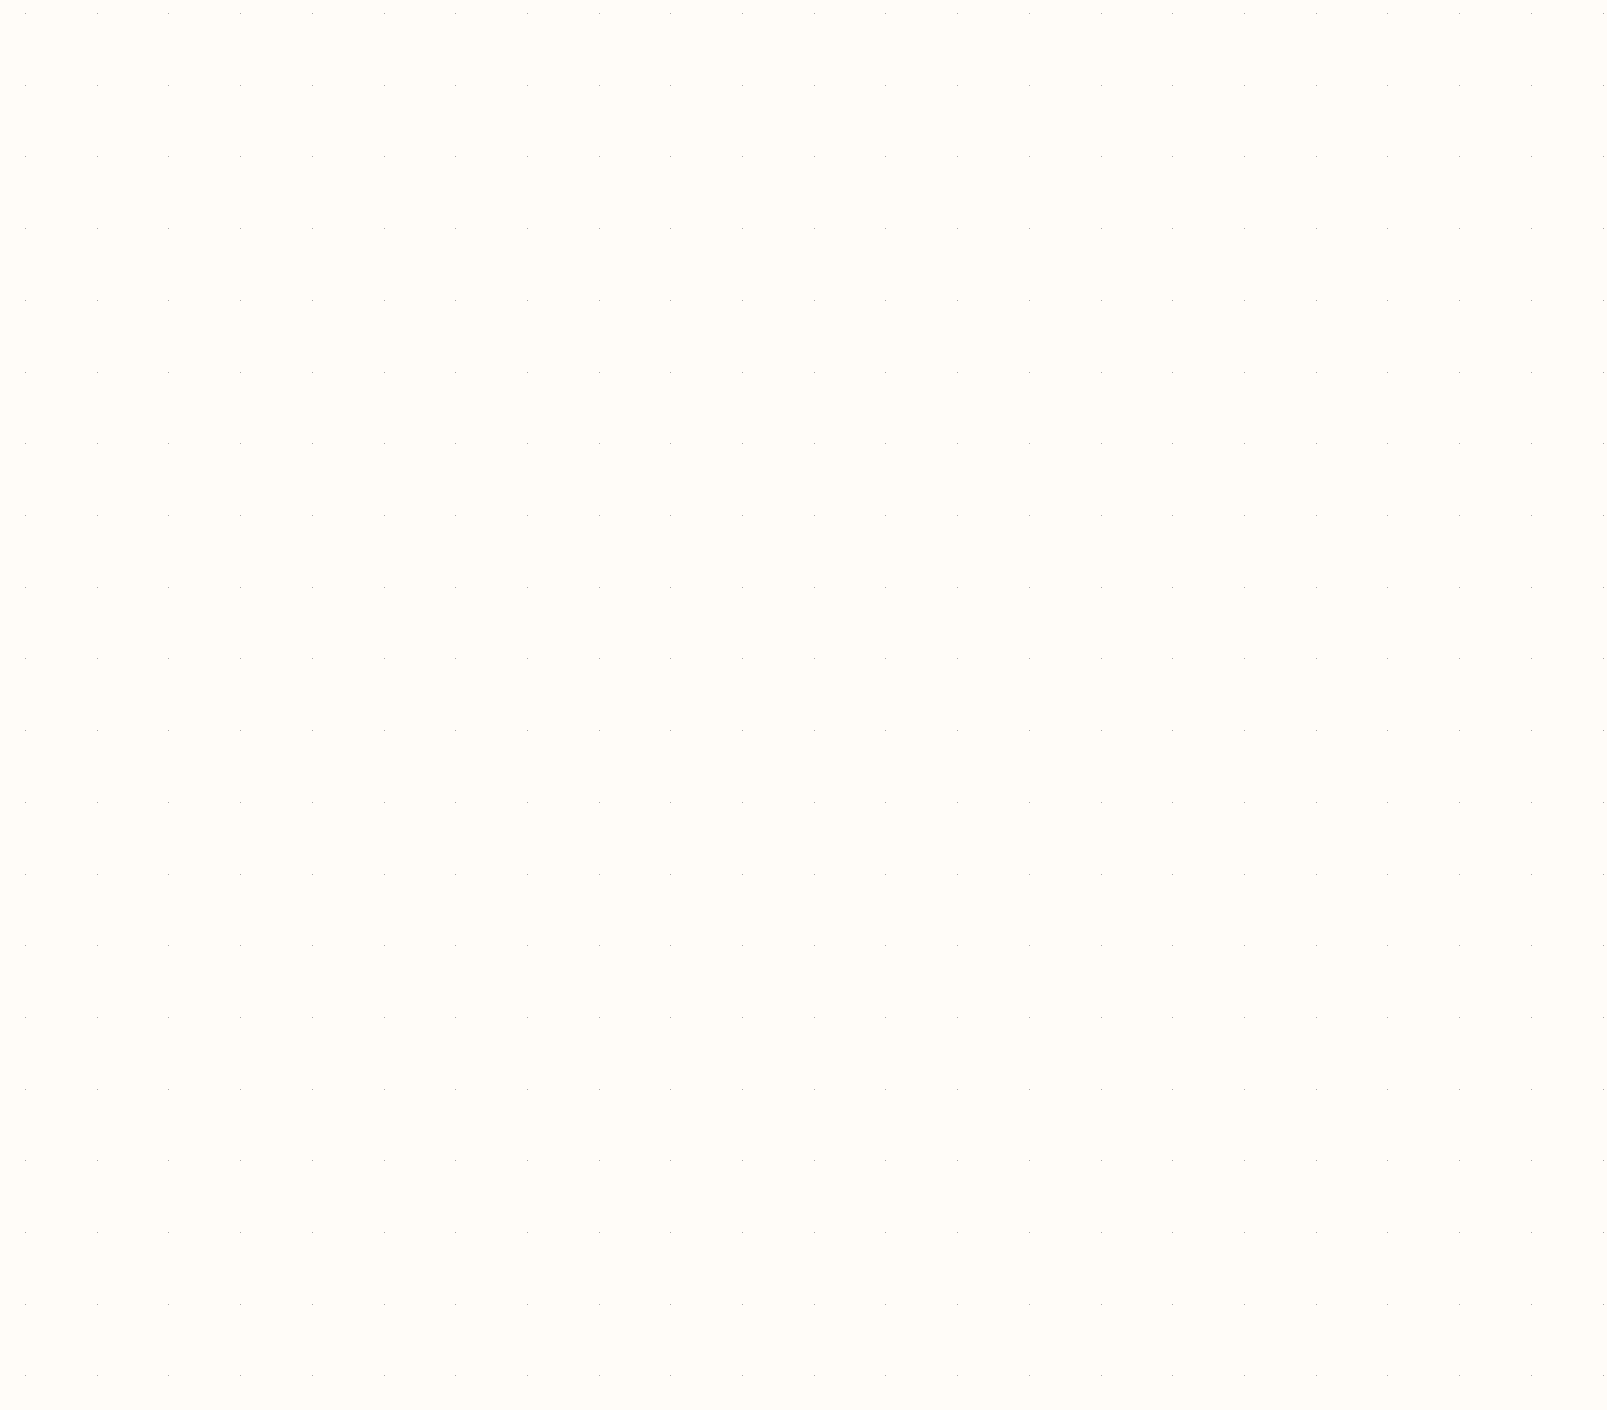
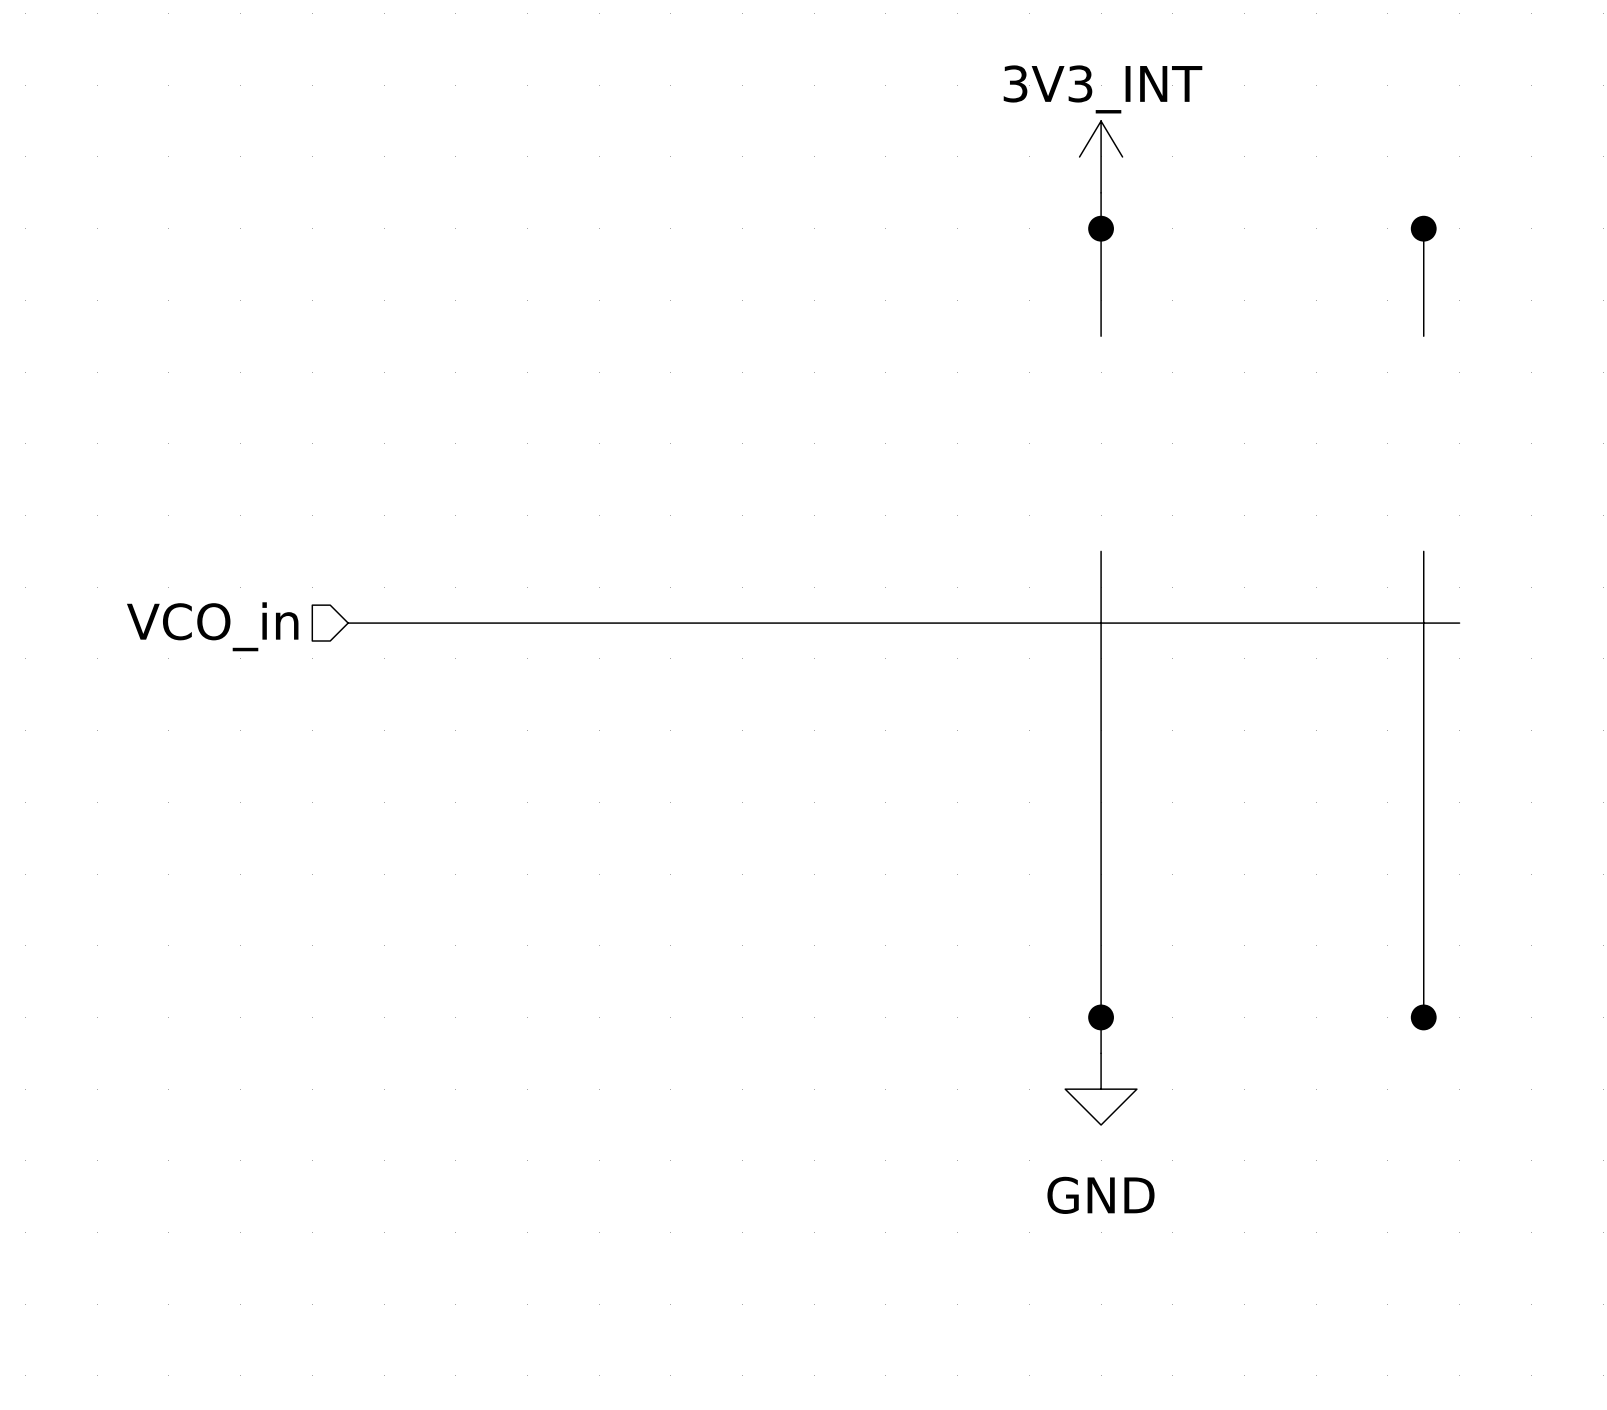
power symbol: none -> 3V3_INT (1101, 156)
wire: none -> (1101, 192) (1101, 336)
junction: none -> (1101, 228)
wire: none -> (1423, 228) (1423, 336)
junction: none -> (1423, 228)
wire: none -> (1101, 551) (1101, 1053)
wire: none -> (1423, 551) (1423, 1017)
wire: none -> (348, 623) (1459, 623)
hierarchical label: none -> VCO_in (212, 626)
junction: none -> (1101, 1017)
junction: none -> (1423, 1017)
power symbol: none -> GND (1101, 1089)

